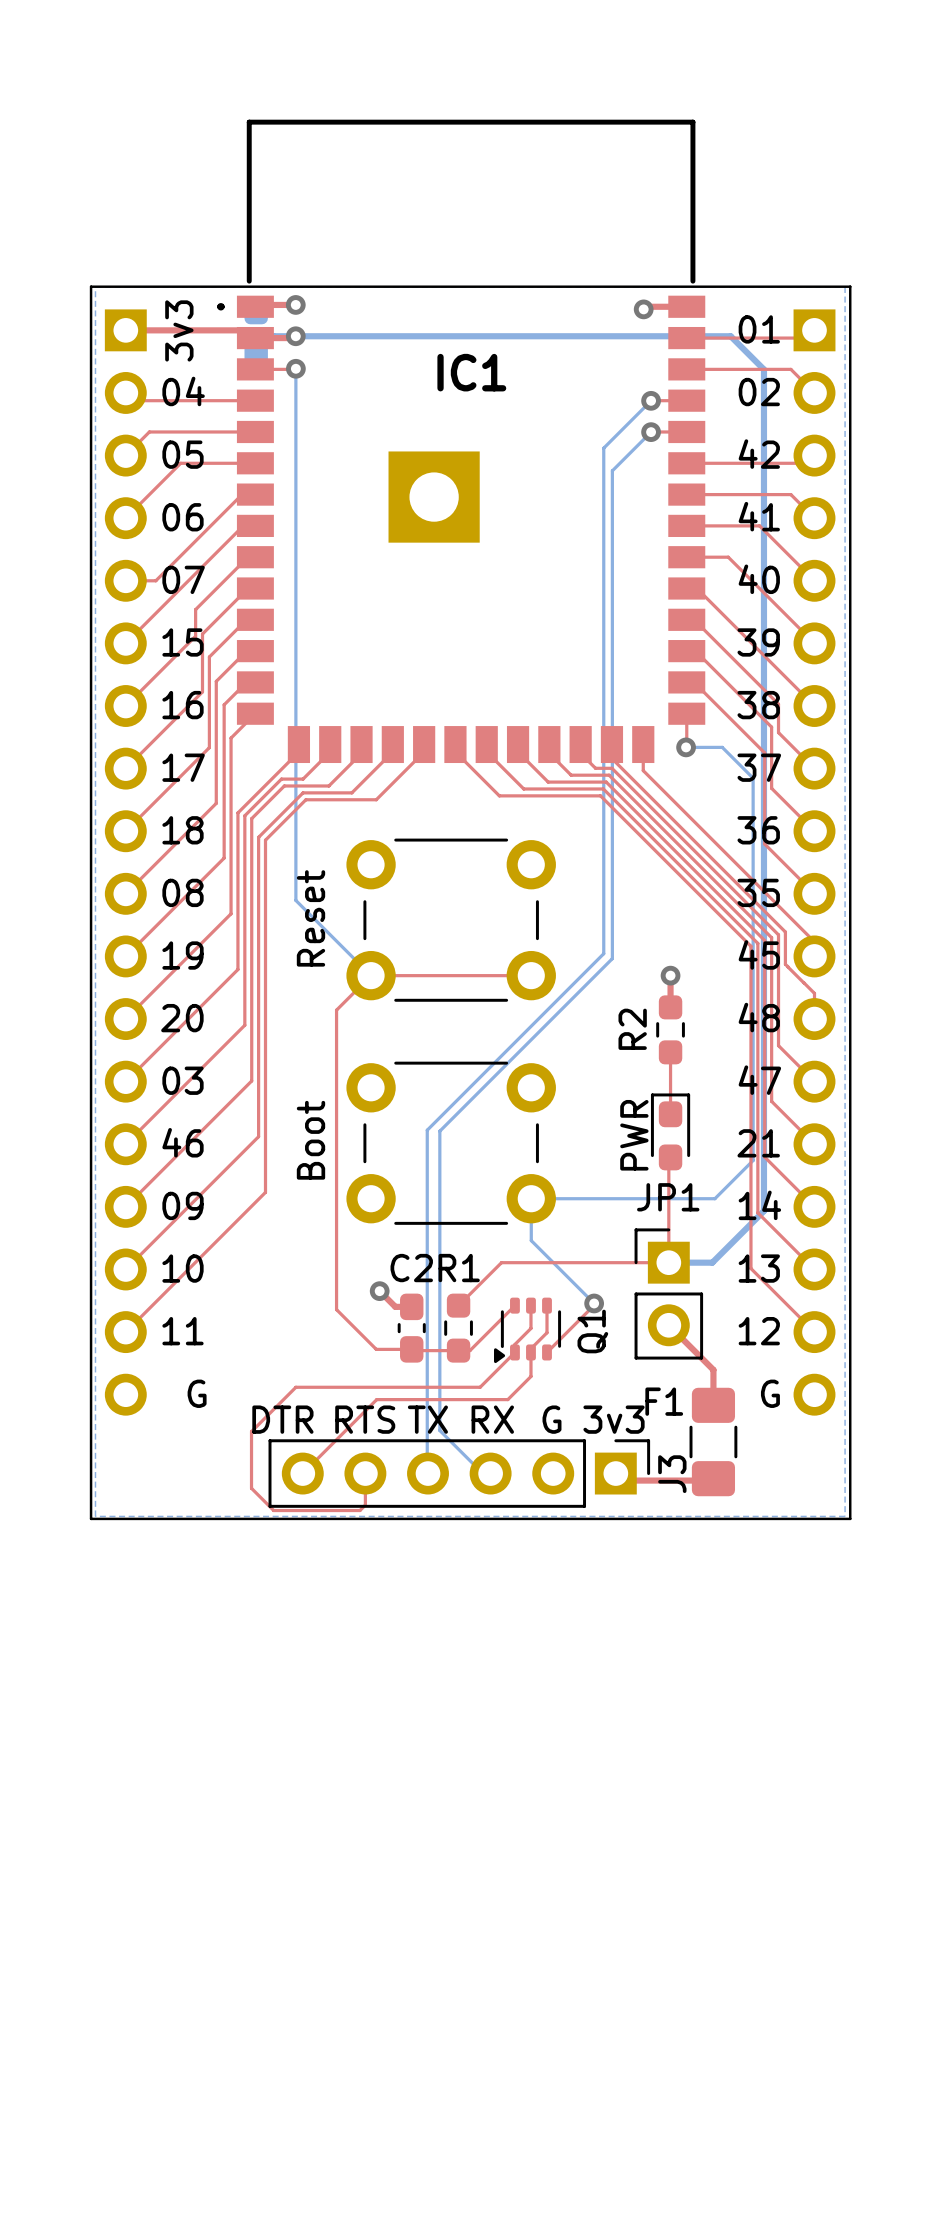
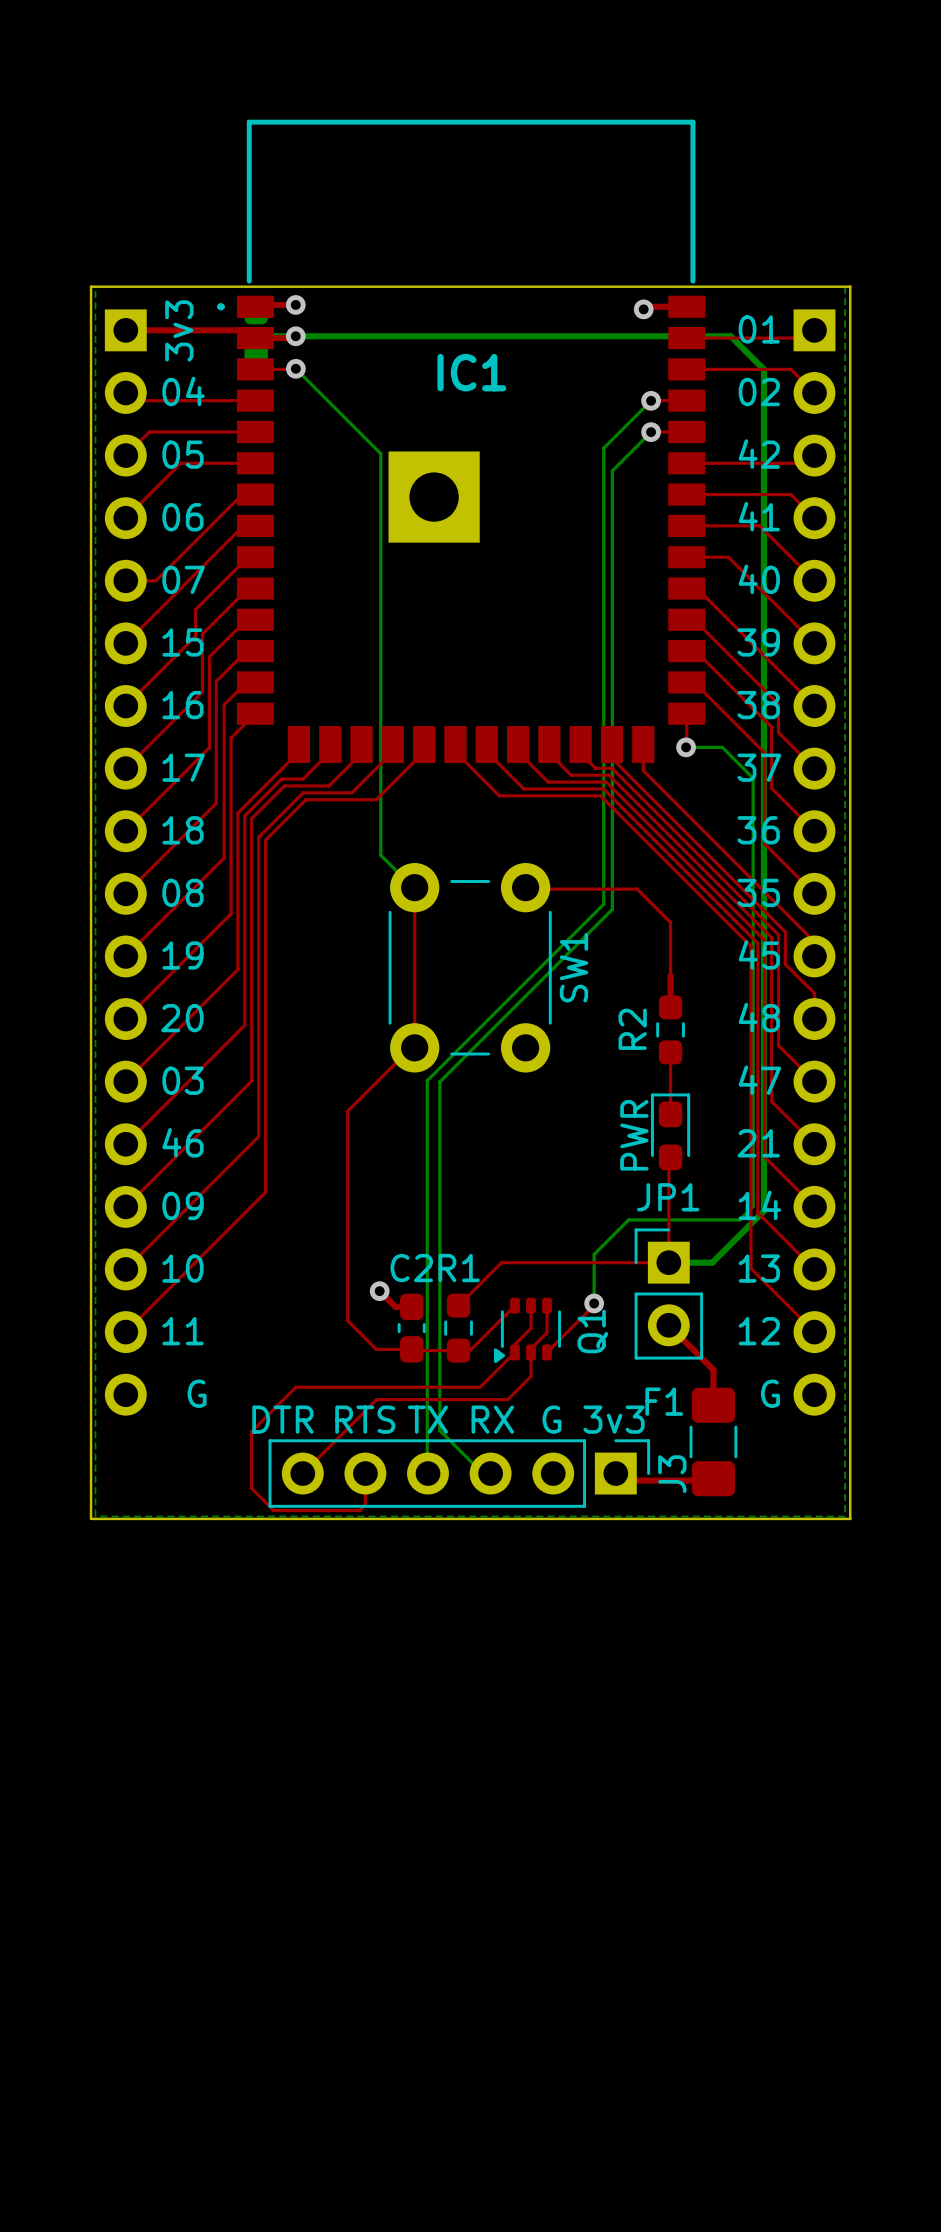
bottom track: (295, 368) (295, 900) (371, 975) -> (295, 368) (380, 453) (380, 855) (414, 889)
top track: none -> (525, 889) (637, 889) (670, 922) (670, 975)
bottom track: (603, 904) (603, 953) (427, 1130) -> (603, 904) (427, 1080) (427, 1130)
bottom track: (612, 909) (612, 958) (439, 1131) -> (612, 909) (439, 1081) (439, 1131)
part: Reset (451, 920) -> none
SW1: none -> (470, 967)
top track: (531, 975) (371, 975) (336, 1010) (336, 1309) (347, 1320) -> (414, 887) (414, 1047) (411, 1047) (347, 1111) (347, 1320)
via: (670, 975) -> none
part: Boot (451, 1143) -> none
bottom track: (753, 1160) (714, 1198) (531, 1198) (531, 1240) (594, 1303) -> (753, 1160) (753, 1206) (739, 1219) (628, 1219) (594, 1254) (594, 1303)

